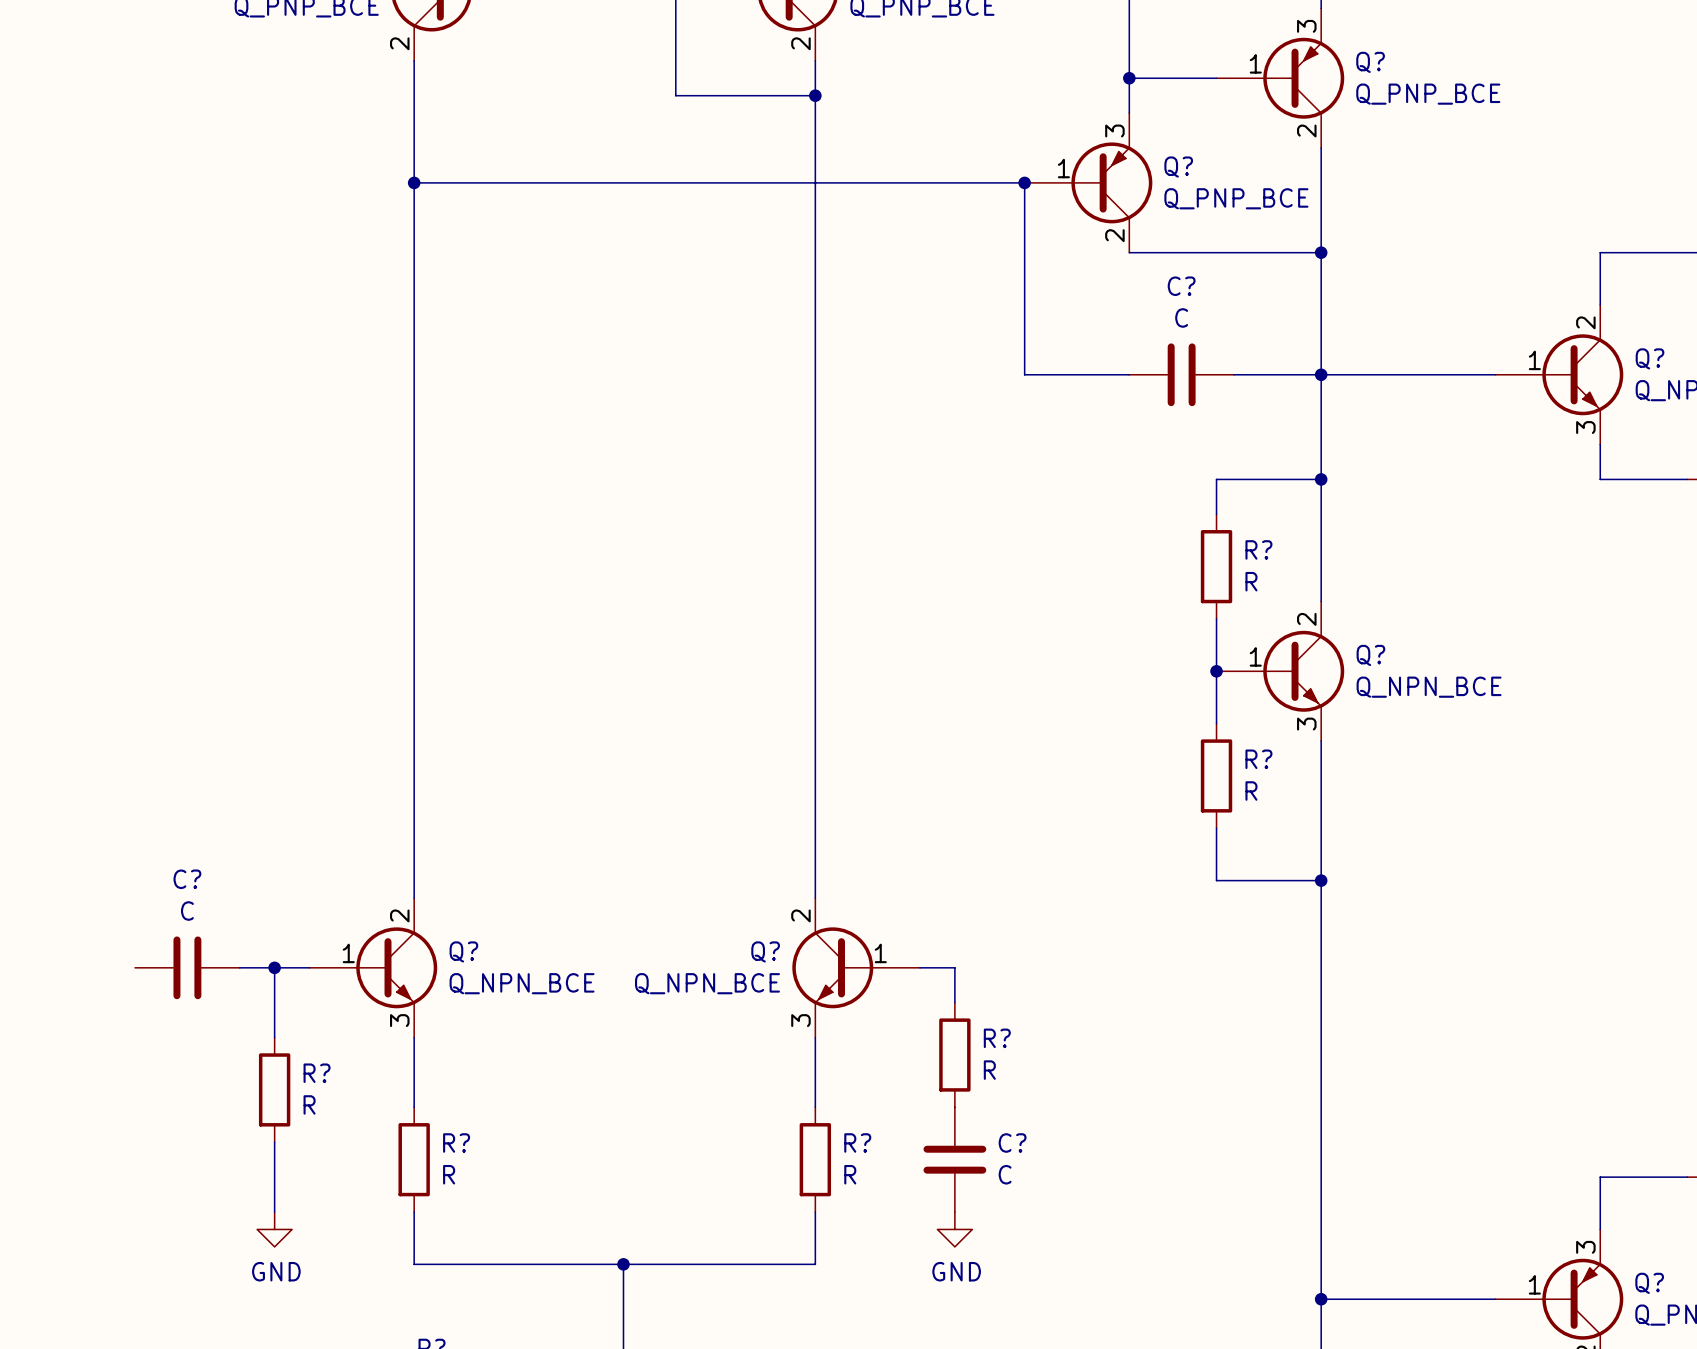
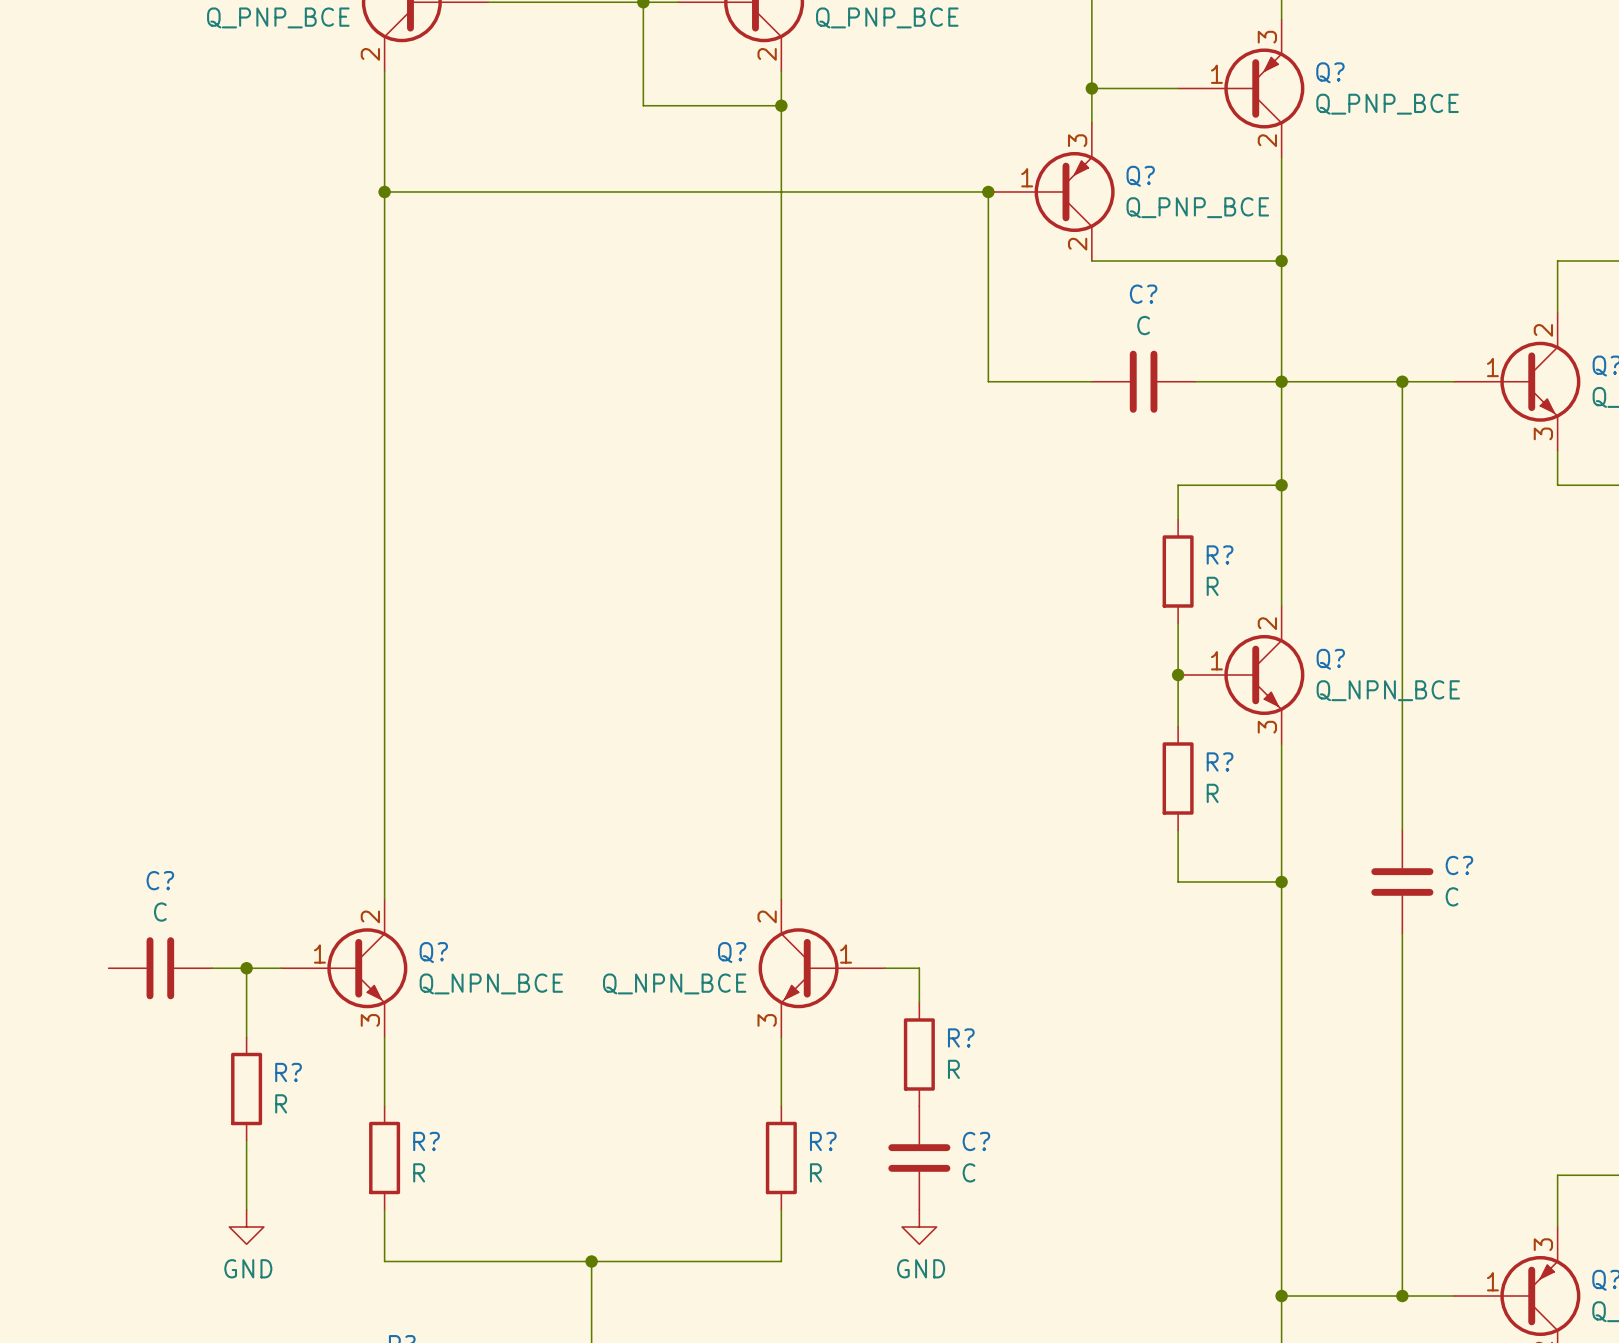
wire: none -> (1402, 381) (1402, 830)
junction: none -> (1402, 381)
C?: none -> C (1402, 881)
wire: none -> (1402, 933) (1402, 1296)
junction: none -> (1402, 1296)

